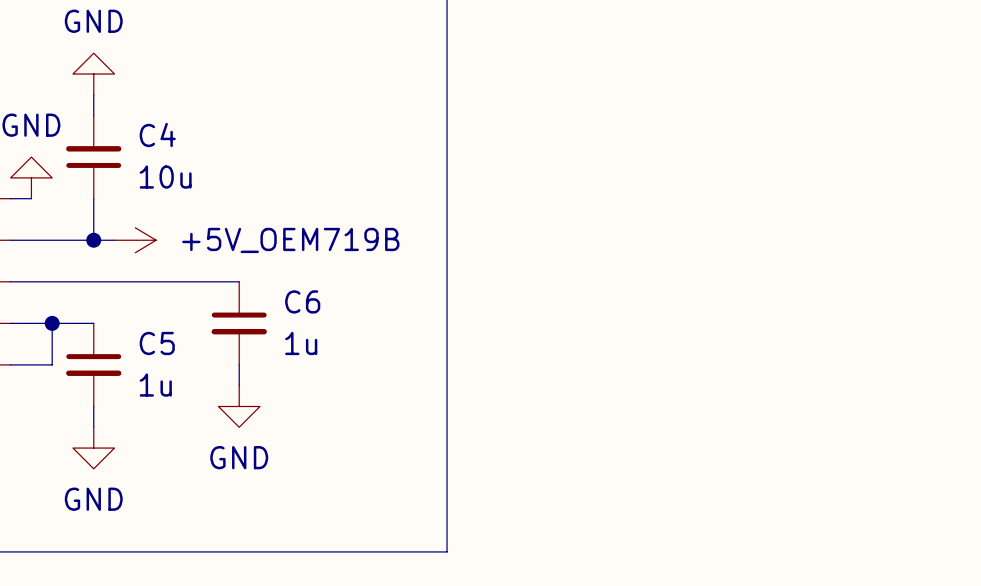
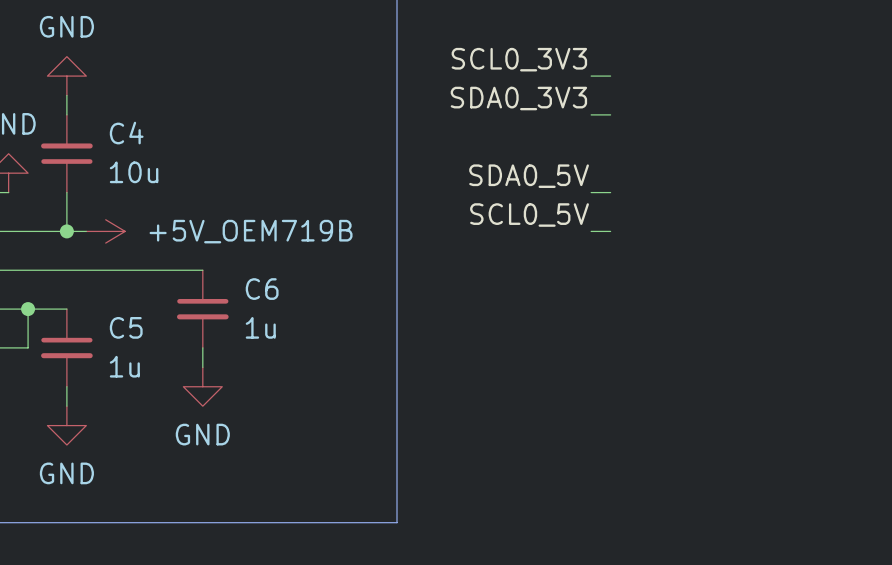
label: none -> SCL0_3V3 (519, 59)
wire: none -> (591, 76) (610, 76)
label: none -> SDA0_3V3 (518, 98)
wire: none -> (591, 114) (610, 114)
label: none -> SDA0_5V (529, 176)
wire: none -> (591, 192) (610, 192)
label: none -> SCL0_5V (529, 215)
wire: none -> (591, 231) (610, 231)

